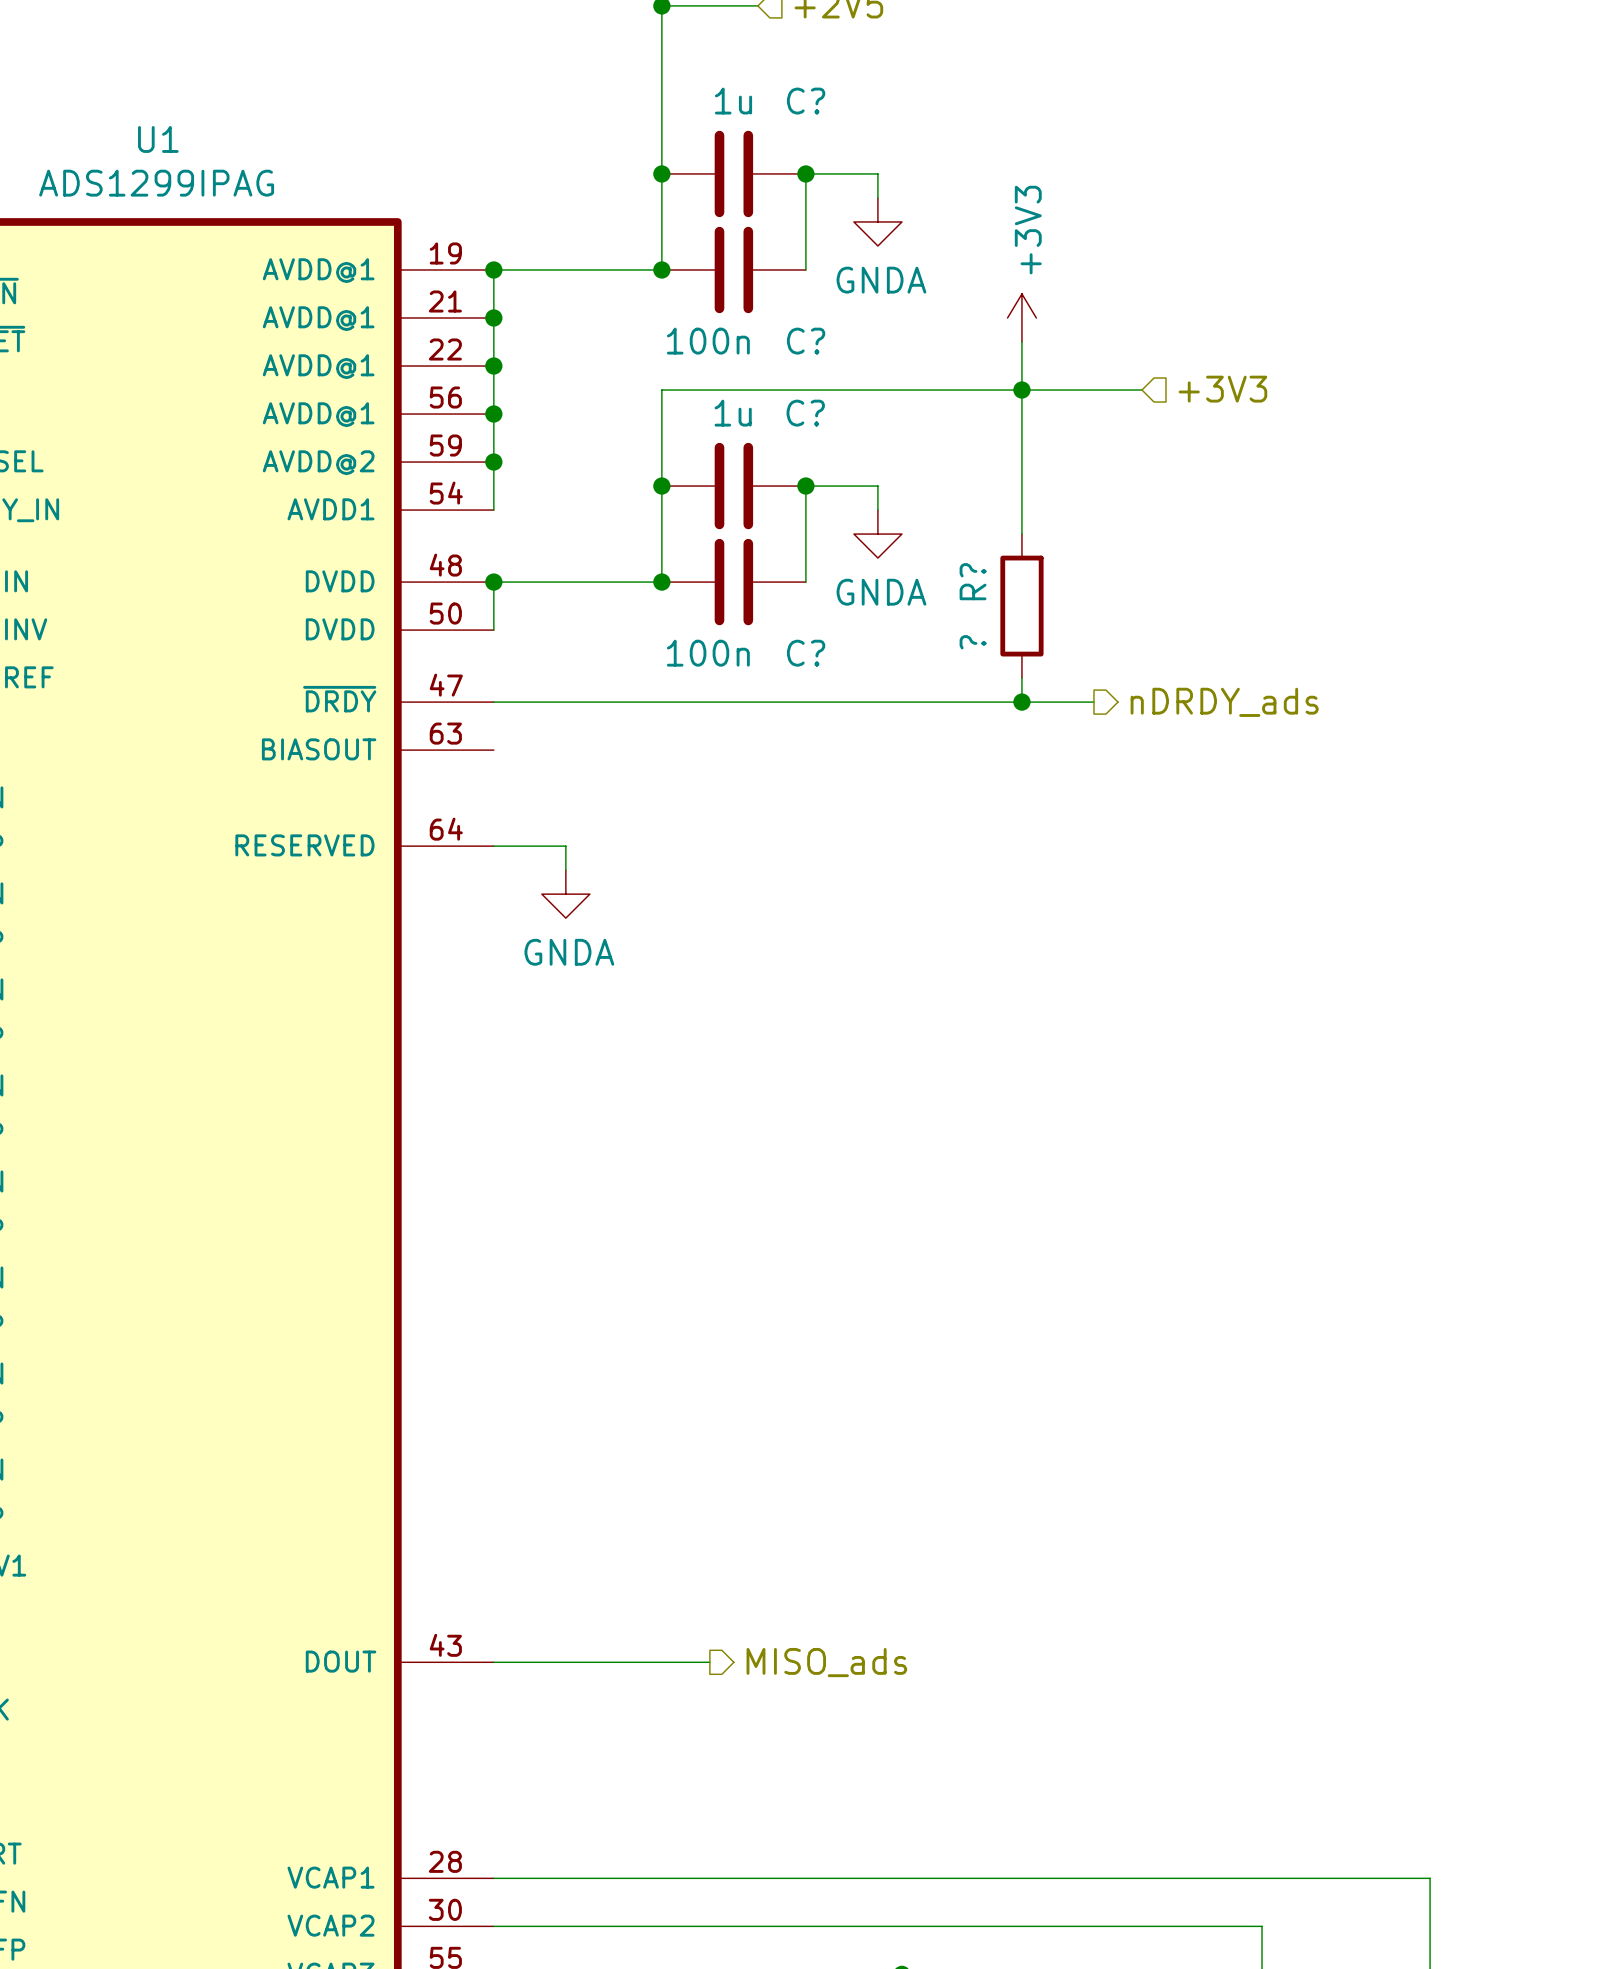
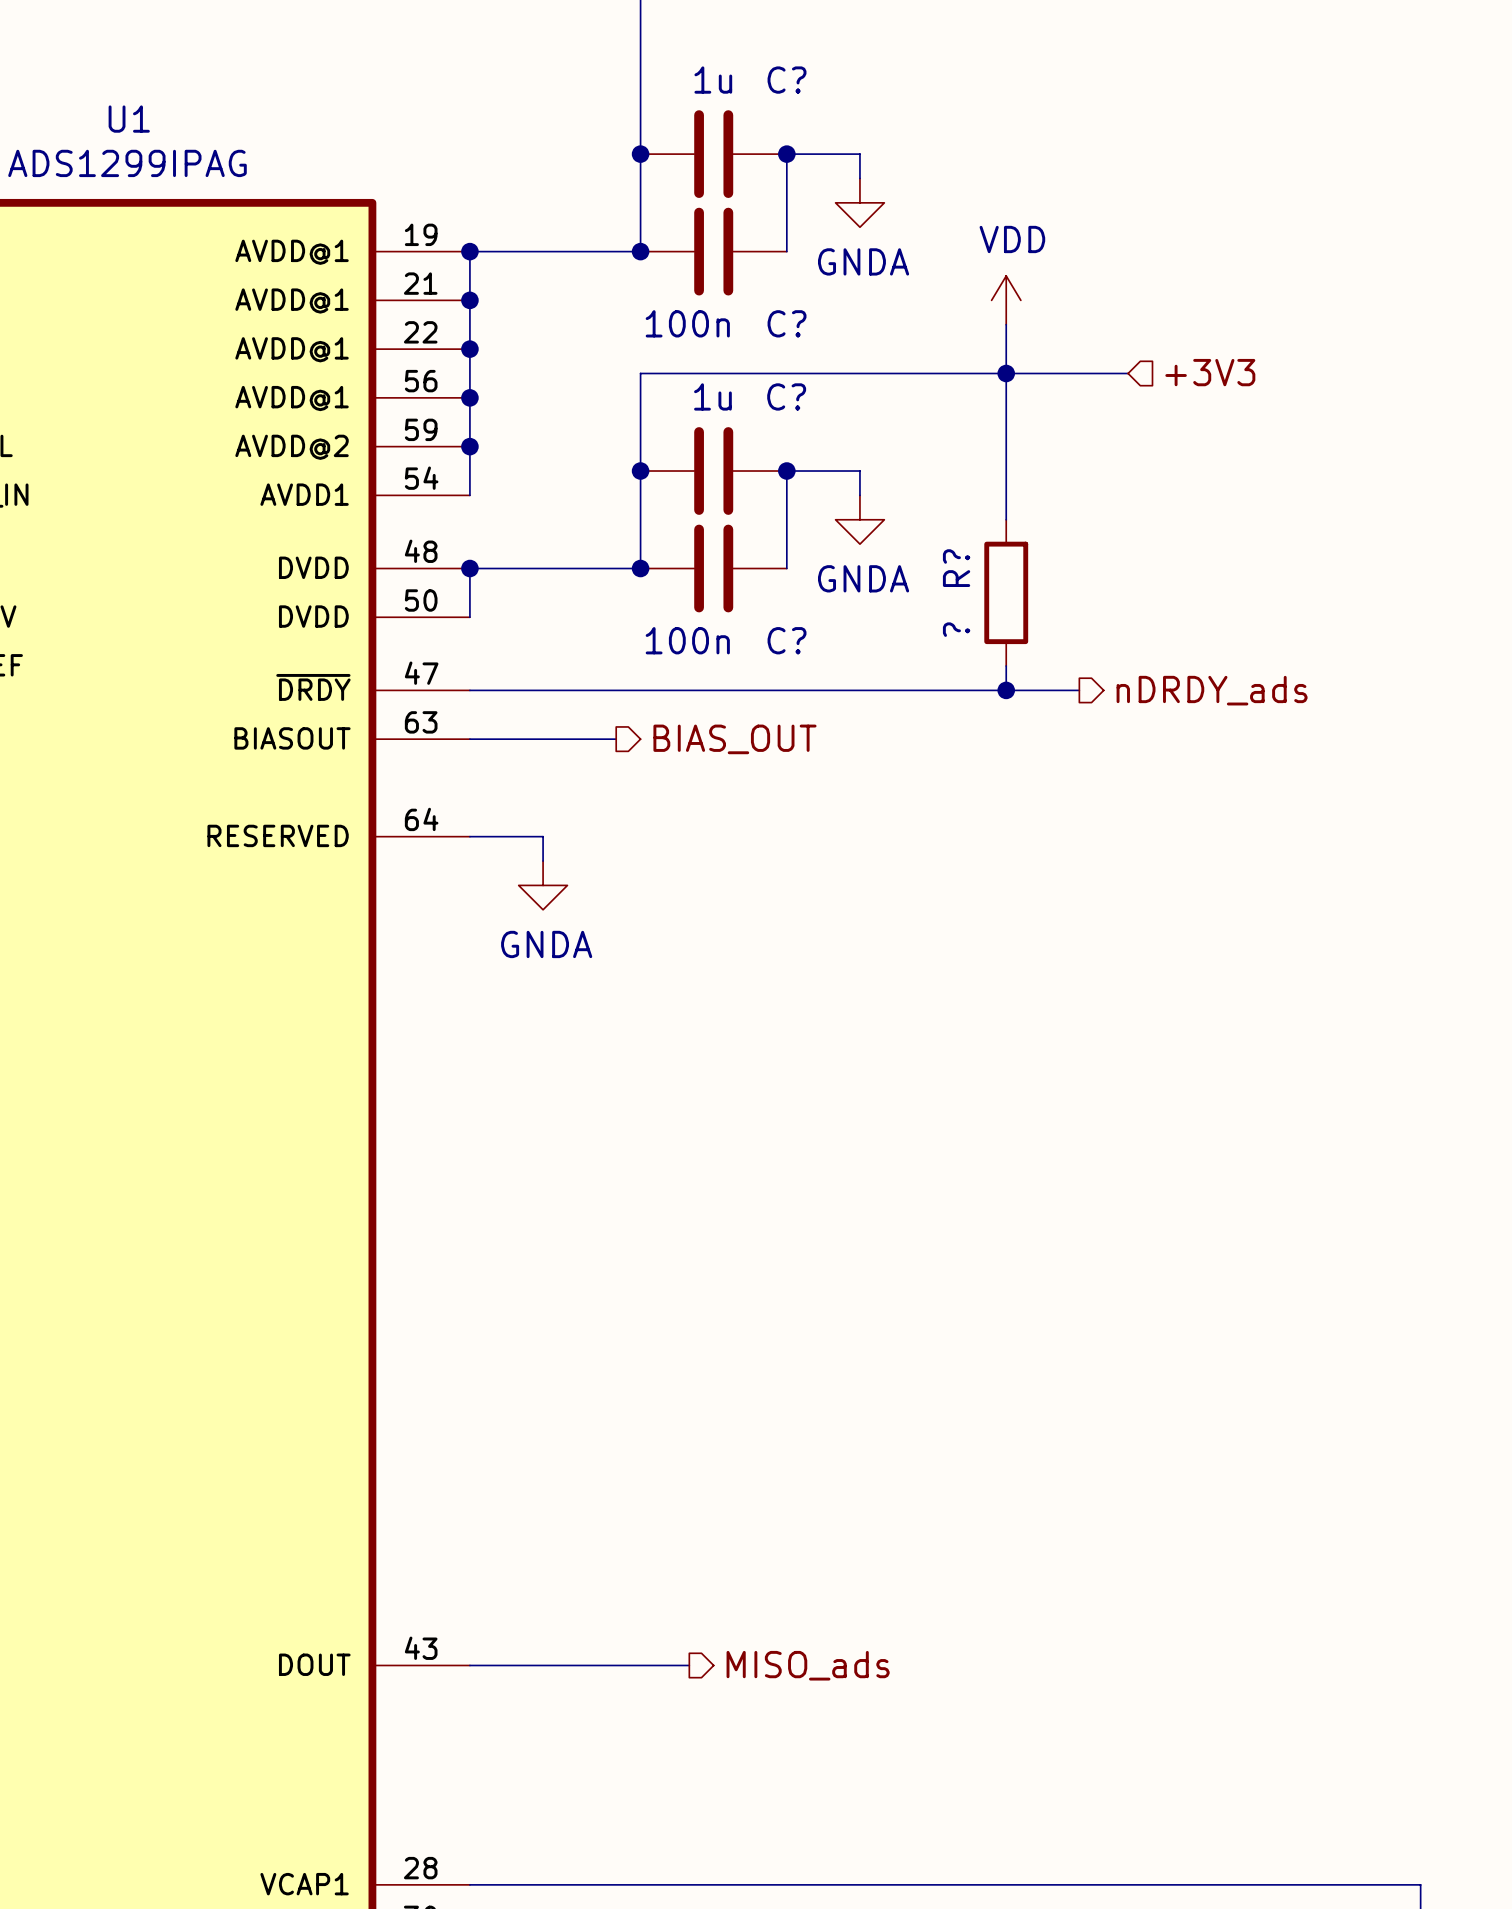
power symbol: +3V3 (1021, 318) -> VDD (1006, 300)
wire: none -> (469, 739) (616, 739)
hierarchical label: none -> BIAS_OUT (734, 739)

